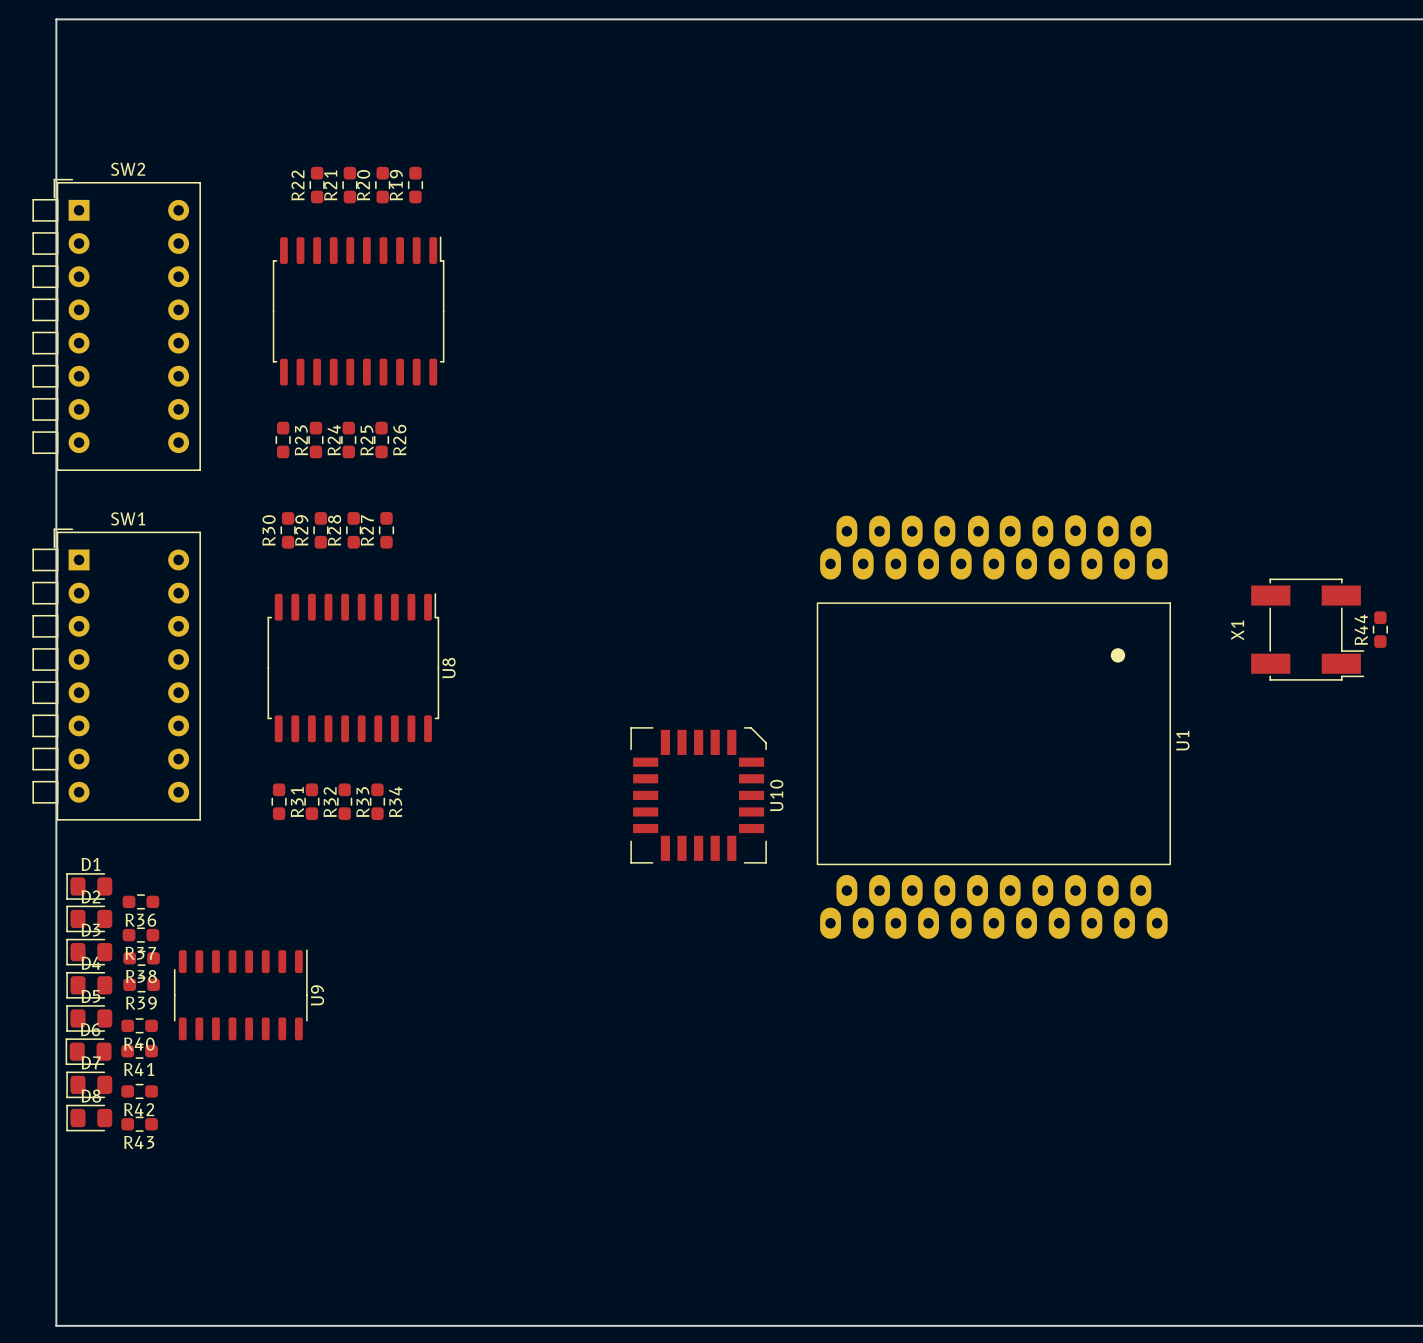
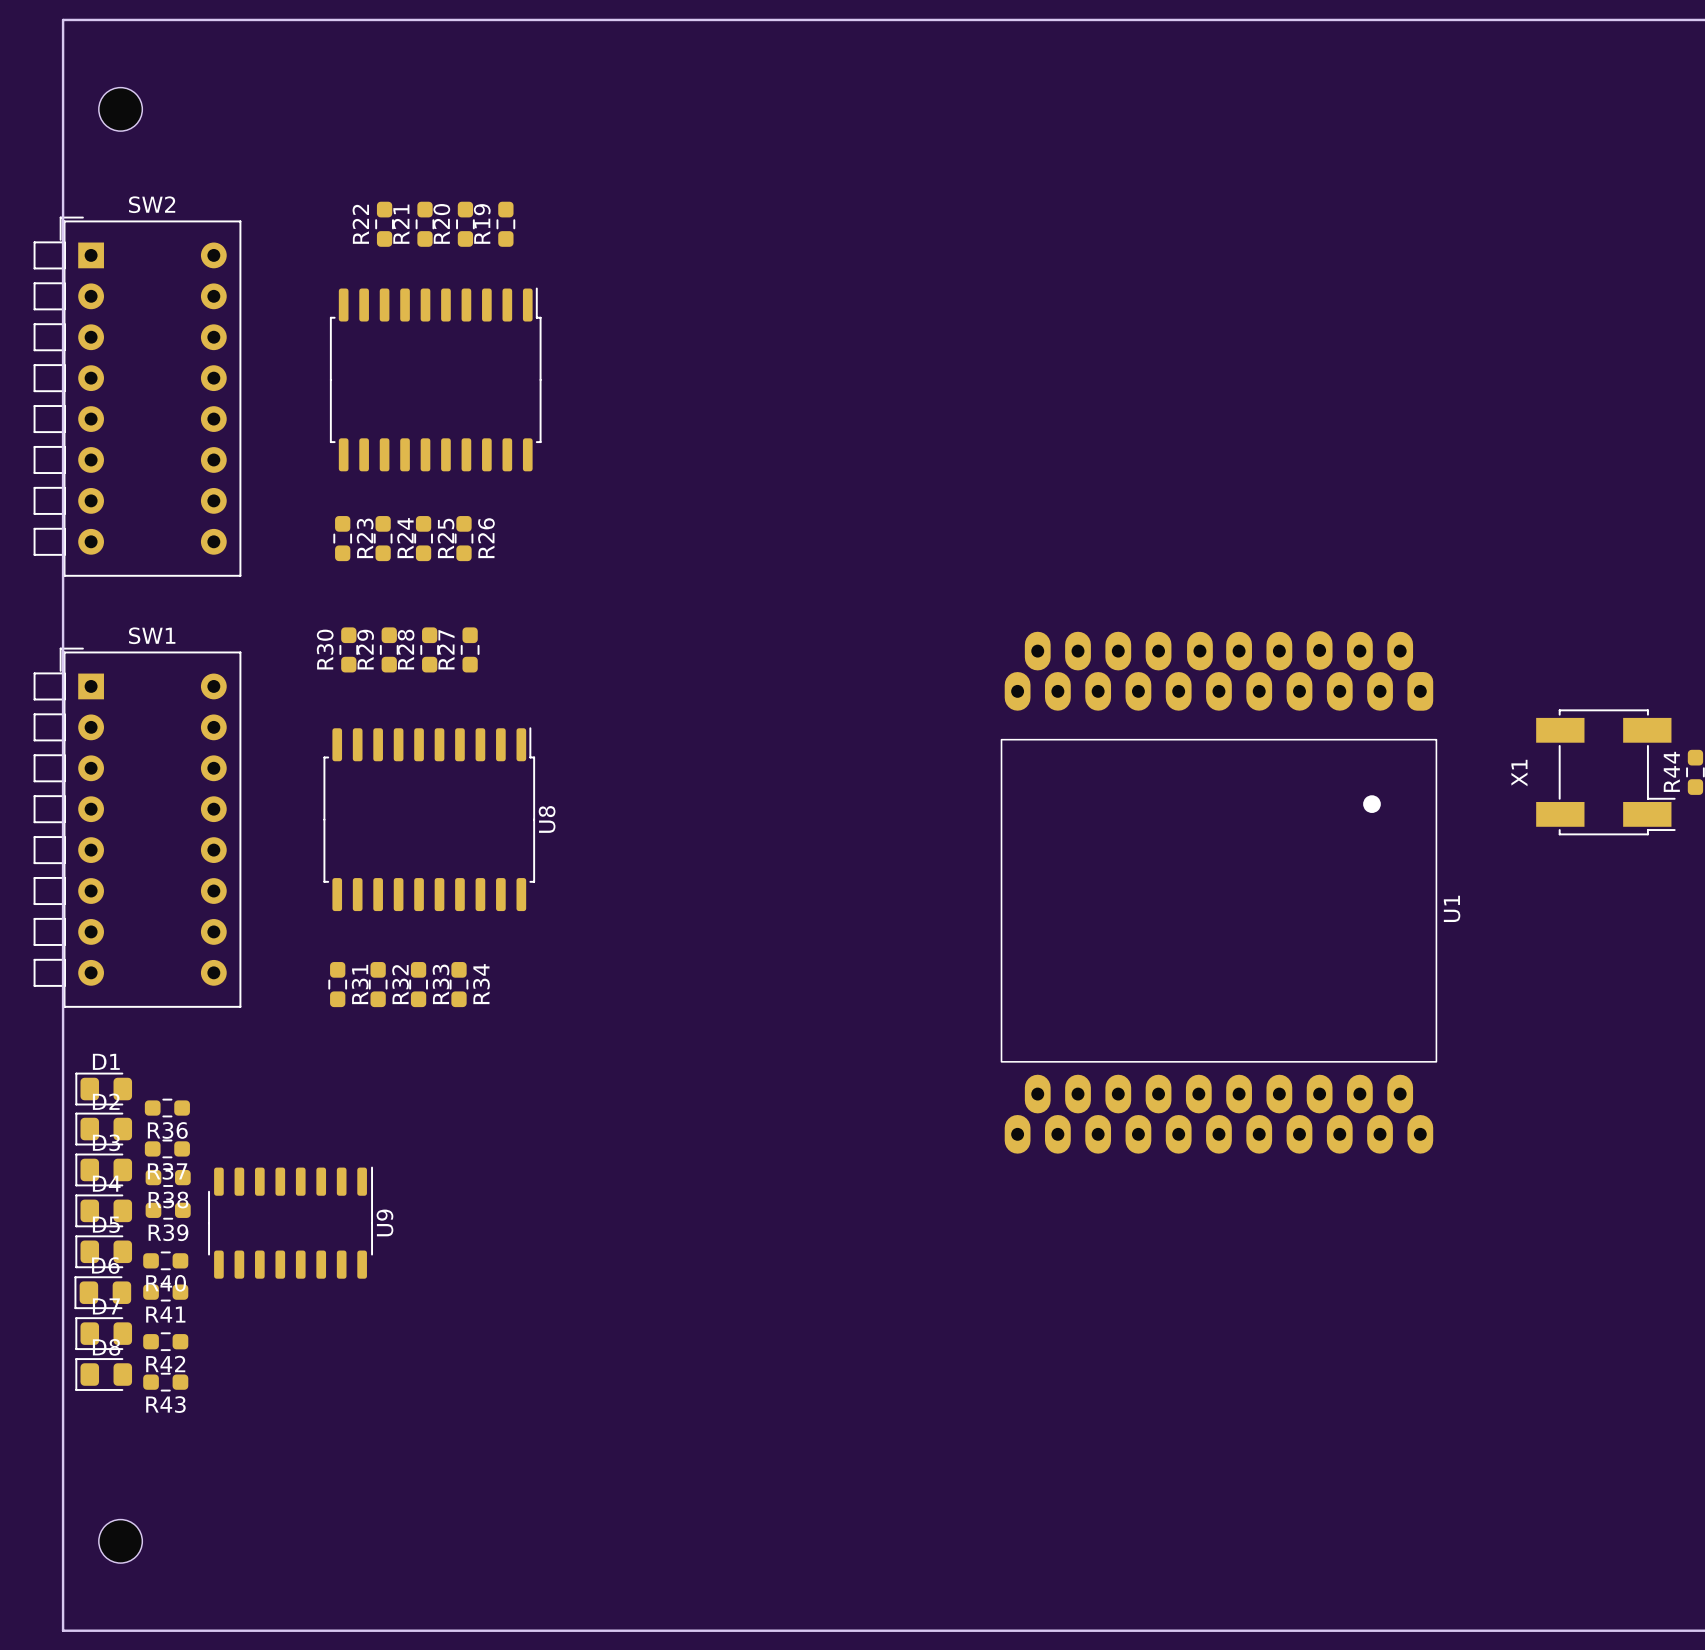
part: none -> (120, 109)
U10: (698, 795) -> none
part: none -> (120, 1541)

